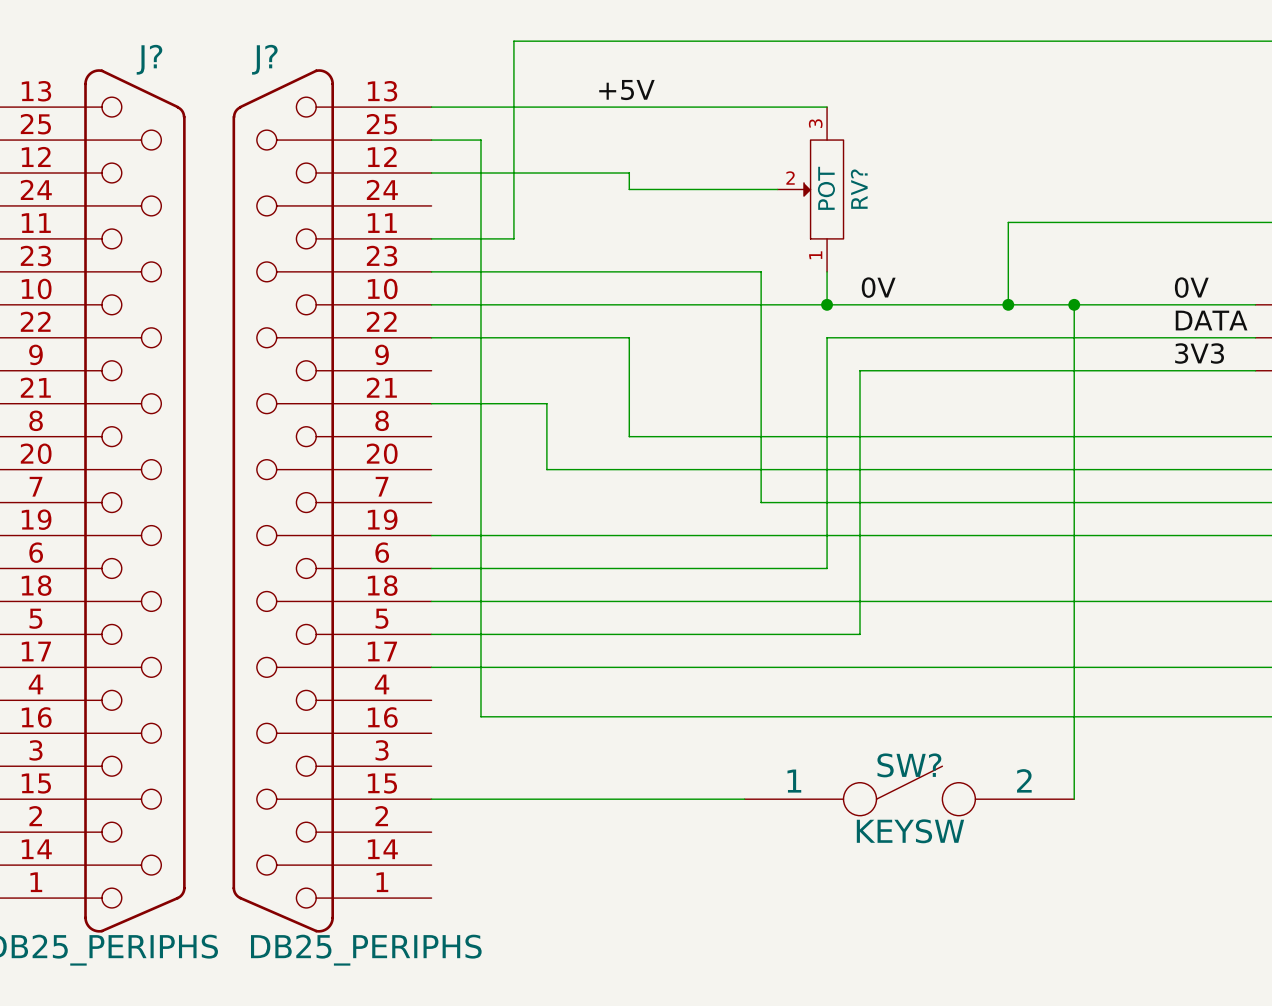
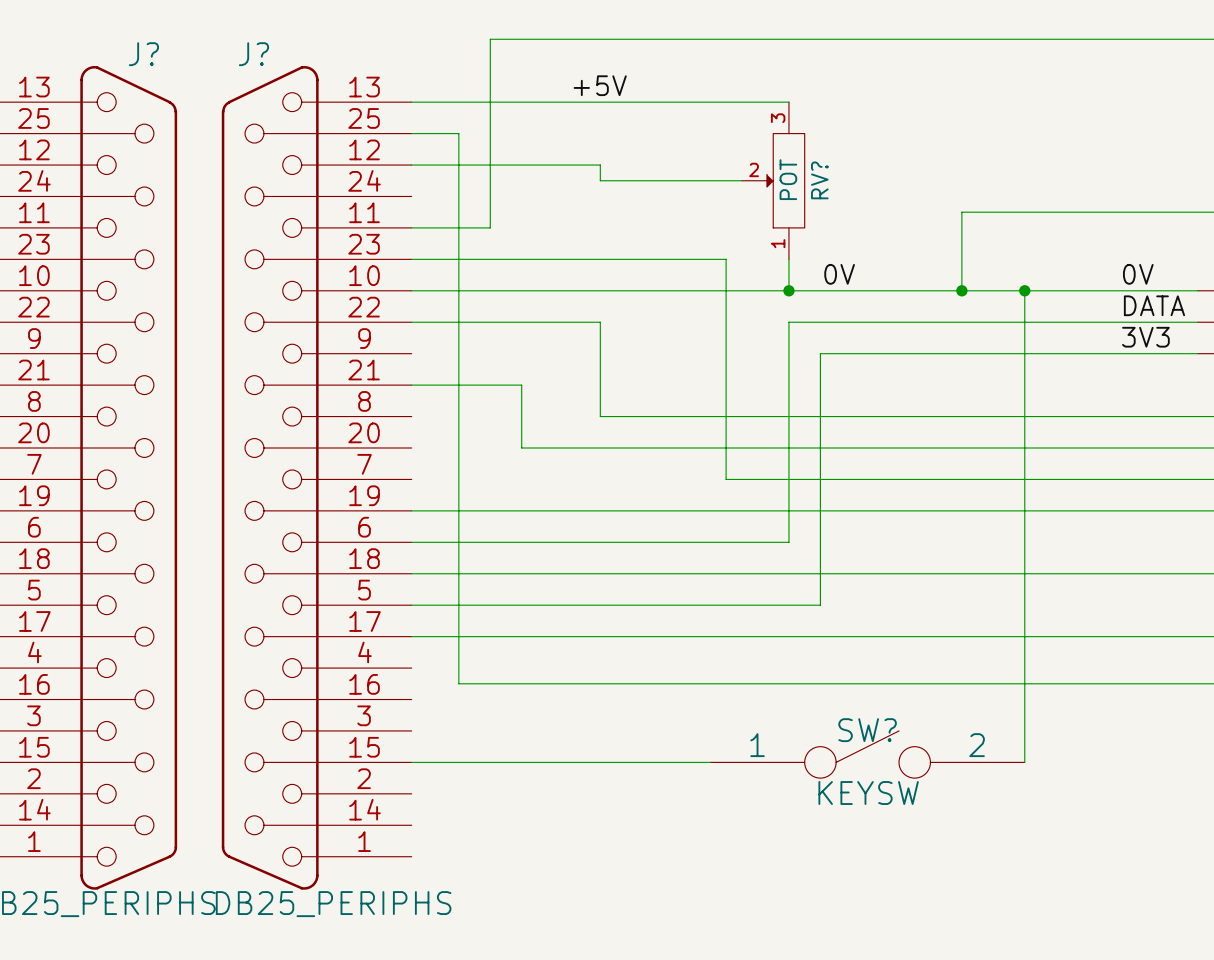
J? value position: DB25_PERIPHS (366, 950) -> DB25_PERIPHS (333, 904)

